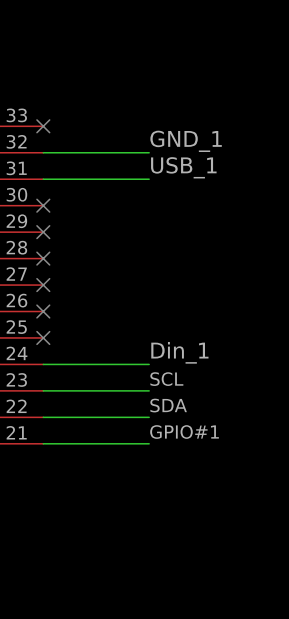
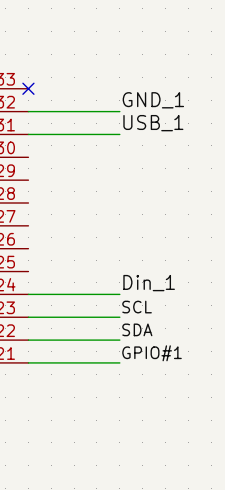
no-connect mark: (43, 205) -> none
no-connect mark: (43, 232) -> none
no-connect mark: (43, 258) -> none
no-connect mark: (43, 285) -> none
no-connect mark: (43, 311) -> none
no-connect mark: (43, 337) -> none

